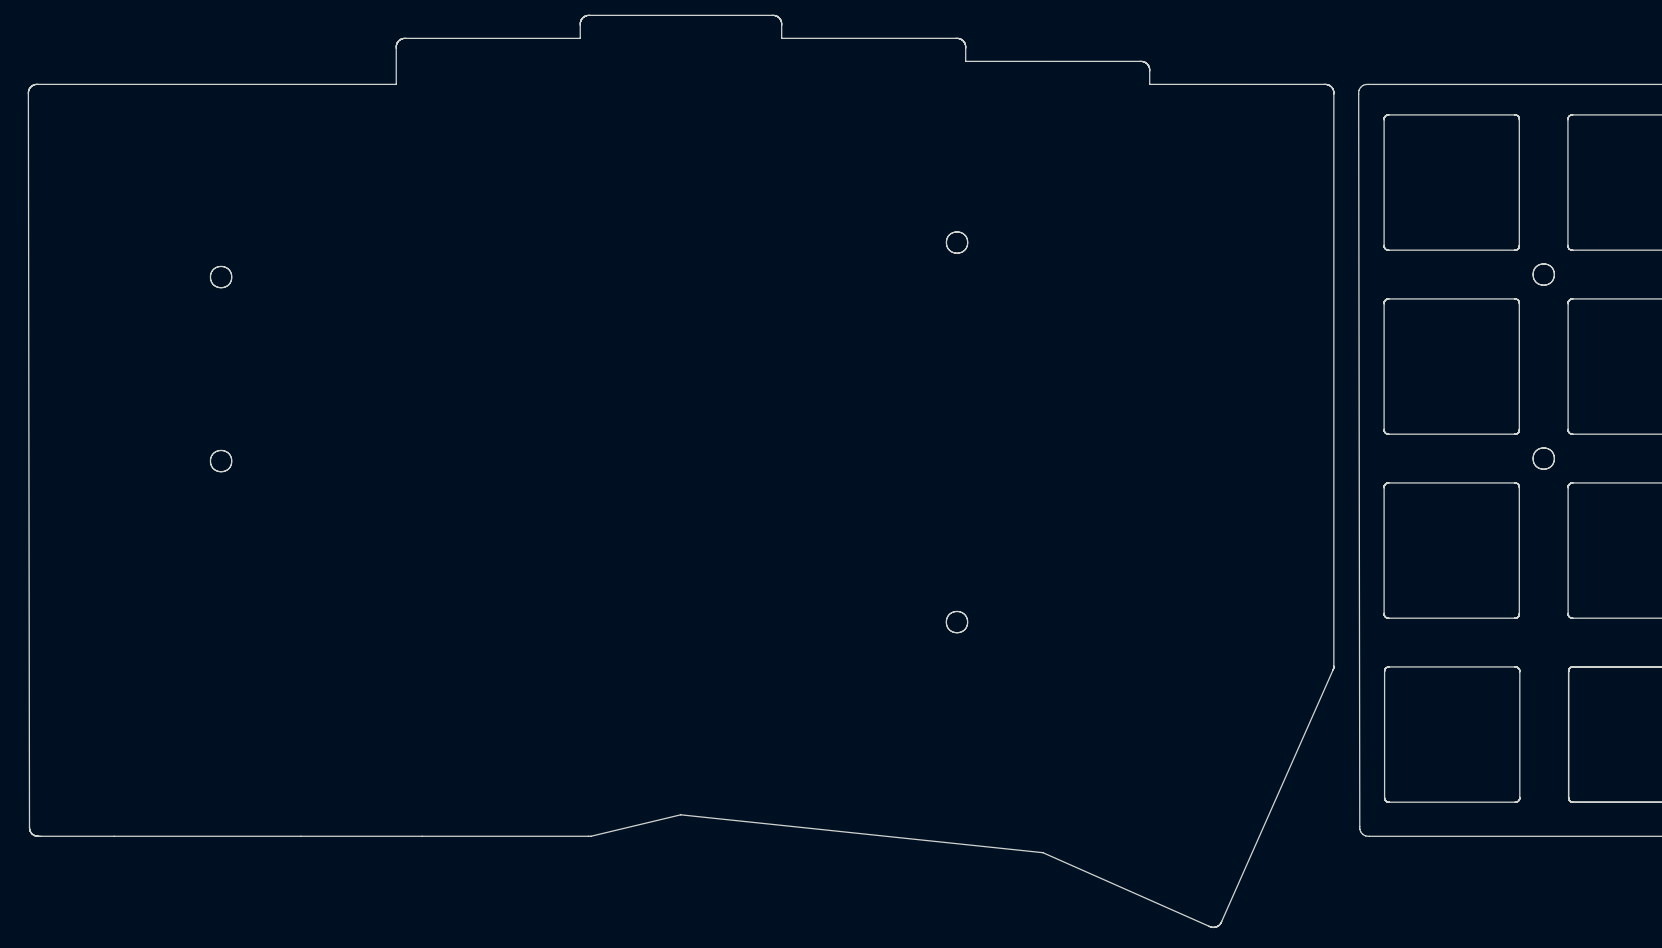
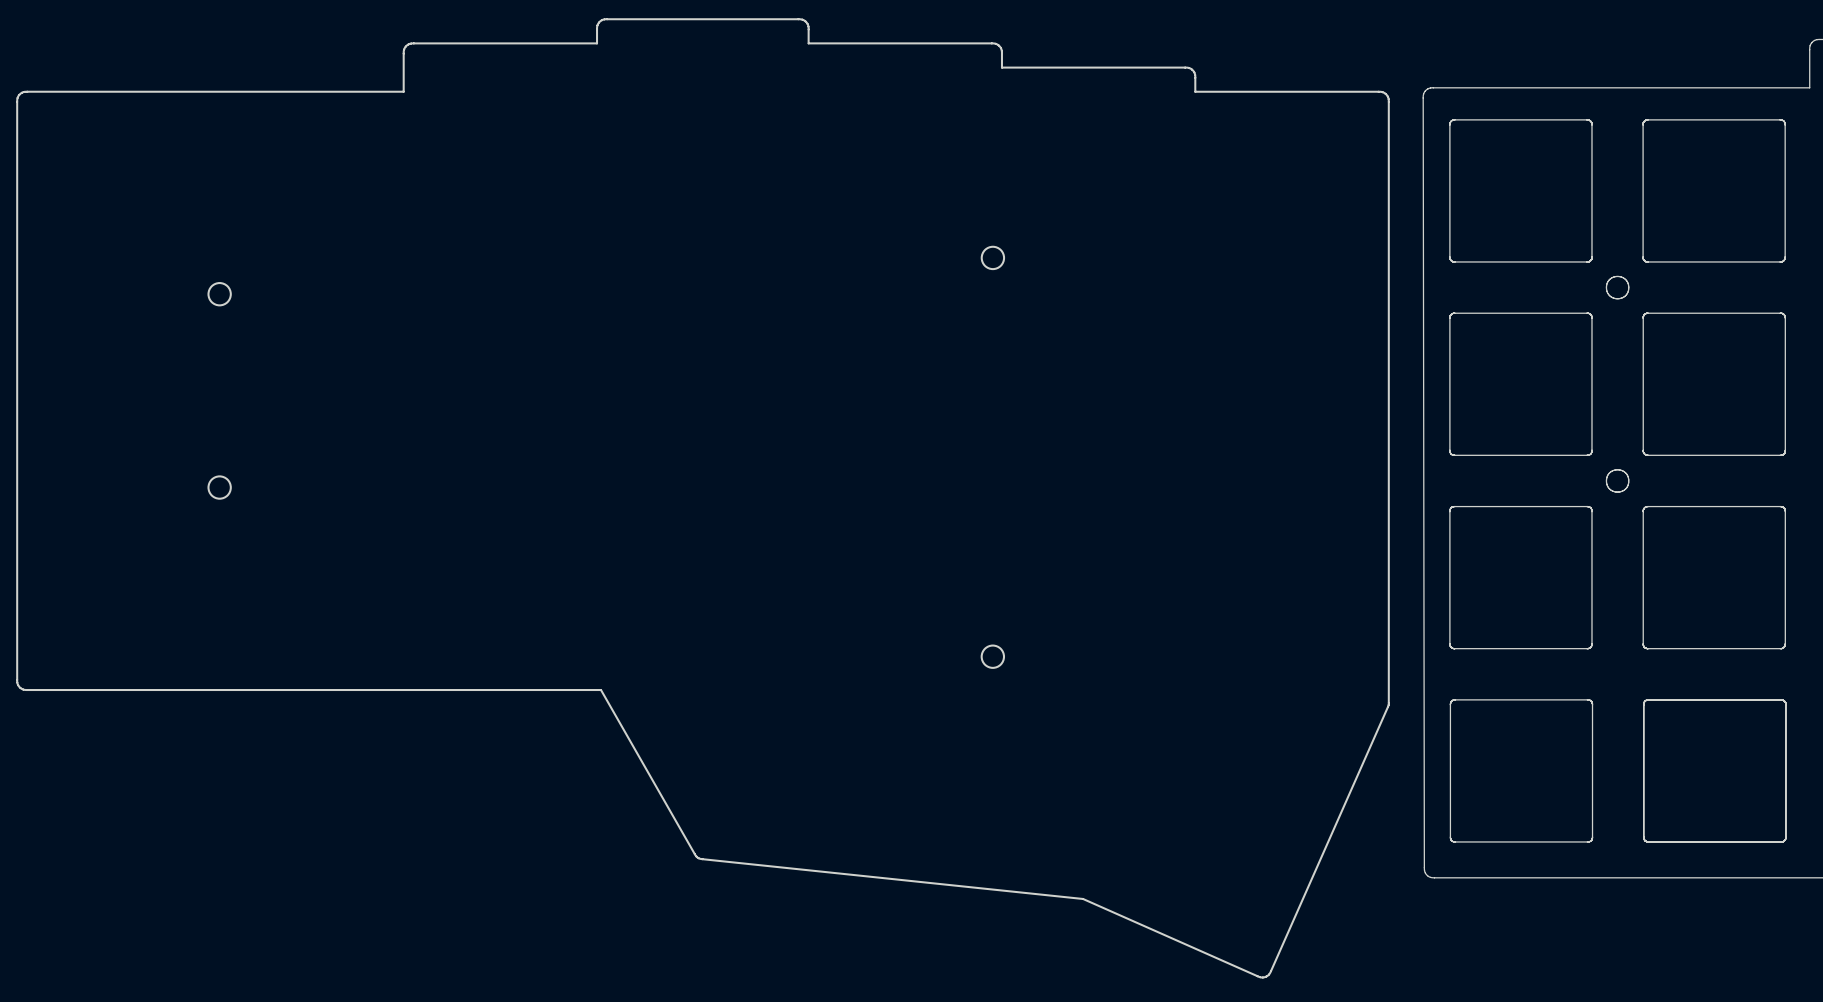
board edge: (586, 15) (772, 15) (780, 19) -> none
board edge: (584, 16) (580, 22) (580, 38) (402, 38) -> none
board edge: none -> (607, 19) (800, 19) (808, 25) (808, 43) (993, 43) (1001, 49) (1001, 67) (1186, 67) (1194, 73) (1195, 91) (1379, 91) (1387, 95) (1388, 101) (1388, 704) (1267, 975) (1258, 976) (1083, 898) (699, 858) (695, 854) (601, 690) (26, 690) (18, 686) (17, 680) (17, 101) (19, 94) (26, 91) (403, 91) (403, 51) (409, 43) (597, 43) (597, 24) (601, 20) (607, 19)
board edge: (781, 21) (781, 38) (956, 38) (964, 42) -> none
board edge: (400, 39) (396, 45) (396, 84) (34, 84) -> none
board edge: (965, 44) (965, 61) (1140, 61) -> none
board edge: (1140, 61) (1145, 62) (1148, 65) -> none
board edge: (1149, 67) (1149, 84) (1325, 84) (1332, 88) -> none
board edge: (32, 85) (28, 93) (29, 830) -> none
board edge: (1333, 90) (1333, 667) -> none
board edge: (956, 231) (948, 236) (946, 243) (949, 250) (958, 253) (965, 249) (967, 241) (964, 234) (956, 231) -> none
round board edge: none -> [980, 245, 1006, 271]
board edge: (221, 266) (213, 269) (210, 277) (213, 284) (221, 287) (229, 284) (231, 277) (229, 269) (221, 266) -> none
round board edge: none -> [207, 282, 232, 307]
board edge: (221, 450) (213, 453) (210, 461) (213, 468) (221, 471) (229, 468) (231, 461) (229, 453) (221, 450) -> none
round board edge: none -> [207, 475, 232, 500]
board edge: (955, 611) (948, 615) (946, 623) (949, 630) (957, 632) (965, 628) (967, 620) (964, 614) (955, 611) -> none
round board edge: none -> [980, 644, 1006, 669]
board edge: (1333, 668) (1221, 922) (1214, 927) -> none
board edge: (30, 831) (34, 835) (39, 836) (591, 836) (680, 814) (1042, 852) (1212, 927) -> none

